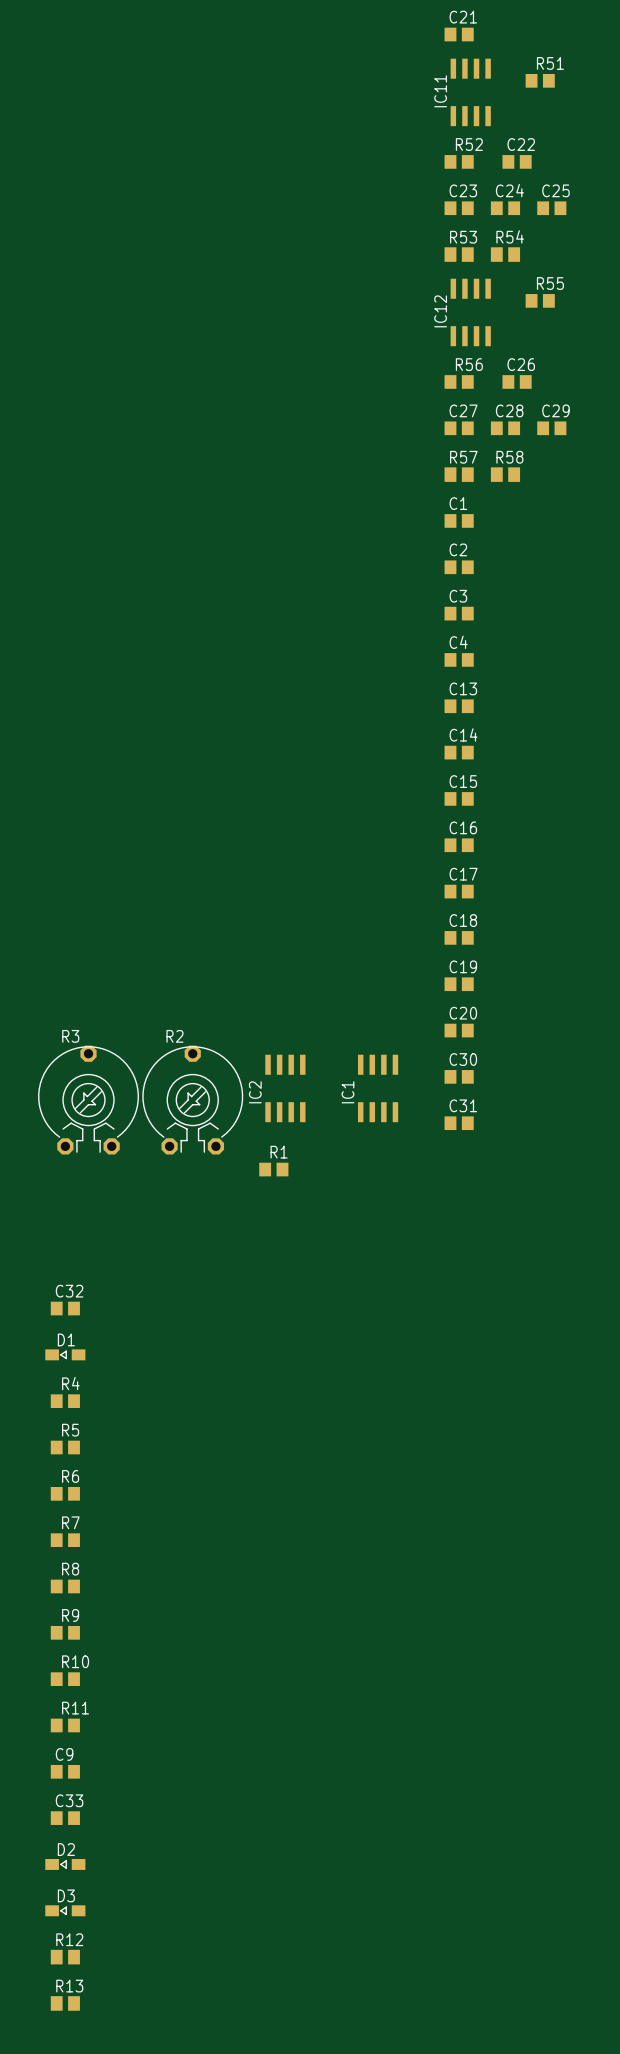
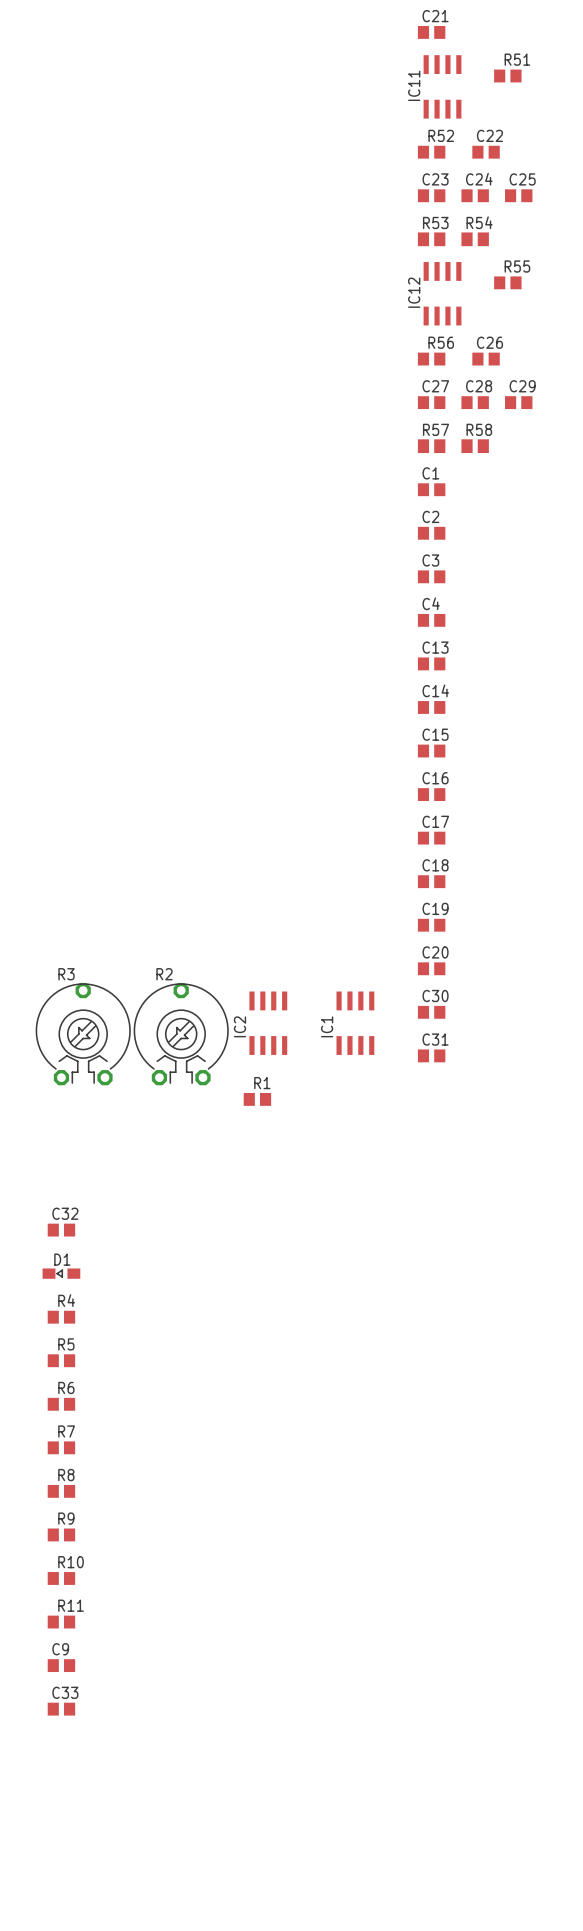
D2: (65, 1864) -> none
D3: (65, 1910) -> none
R12: (65, 1957) -> none
R13: (65, 2003) -> none

